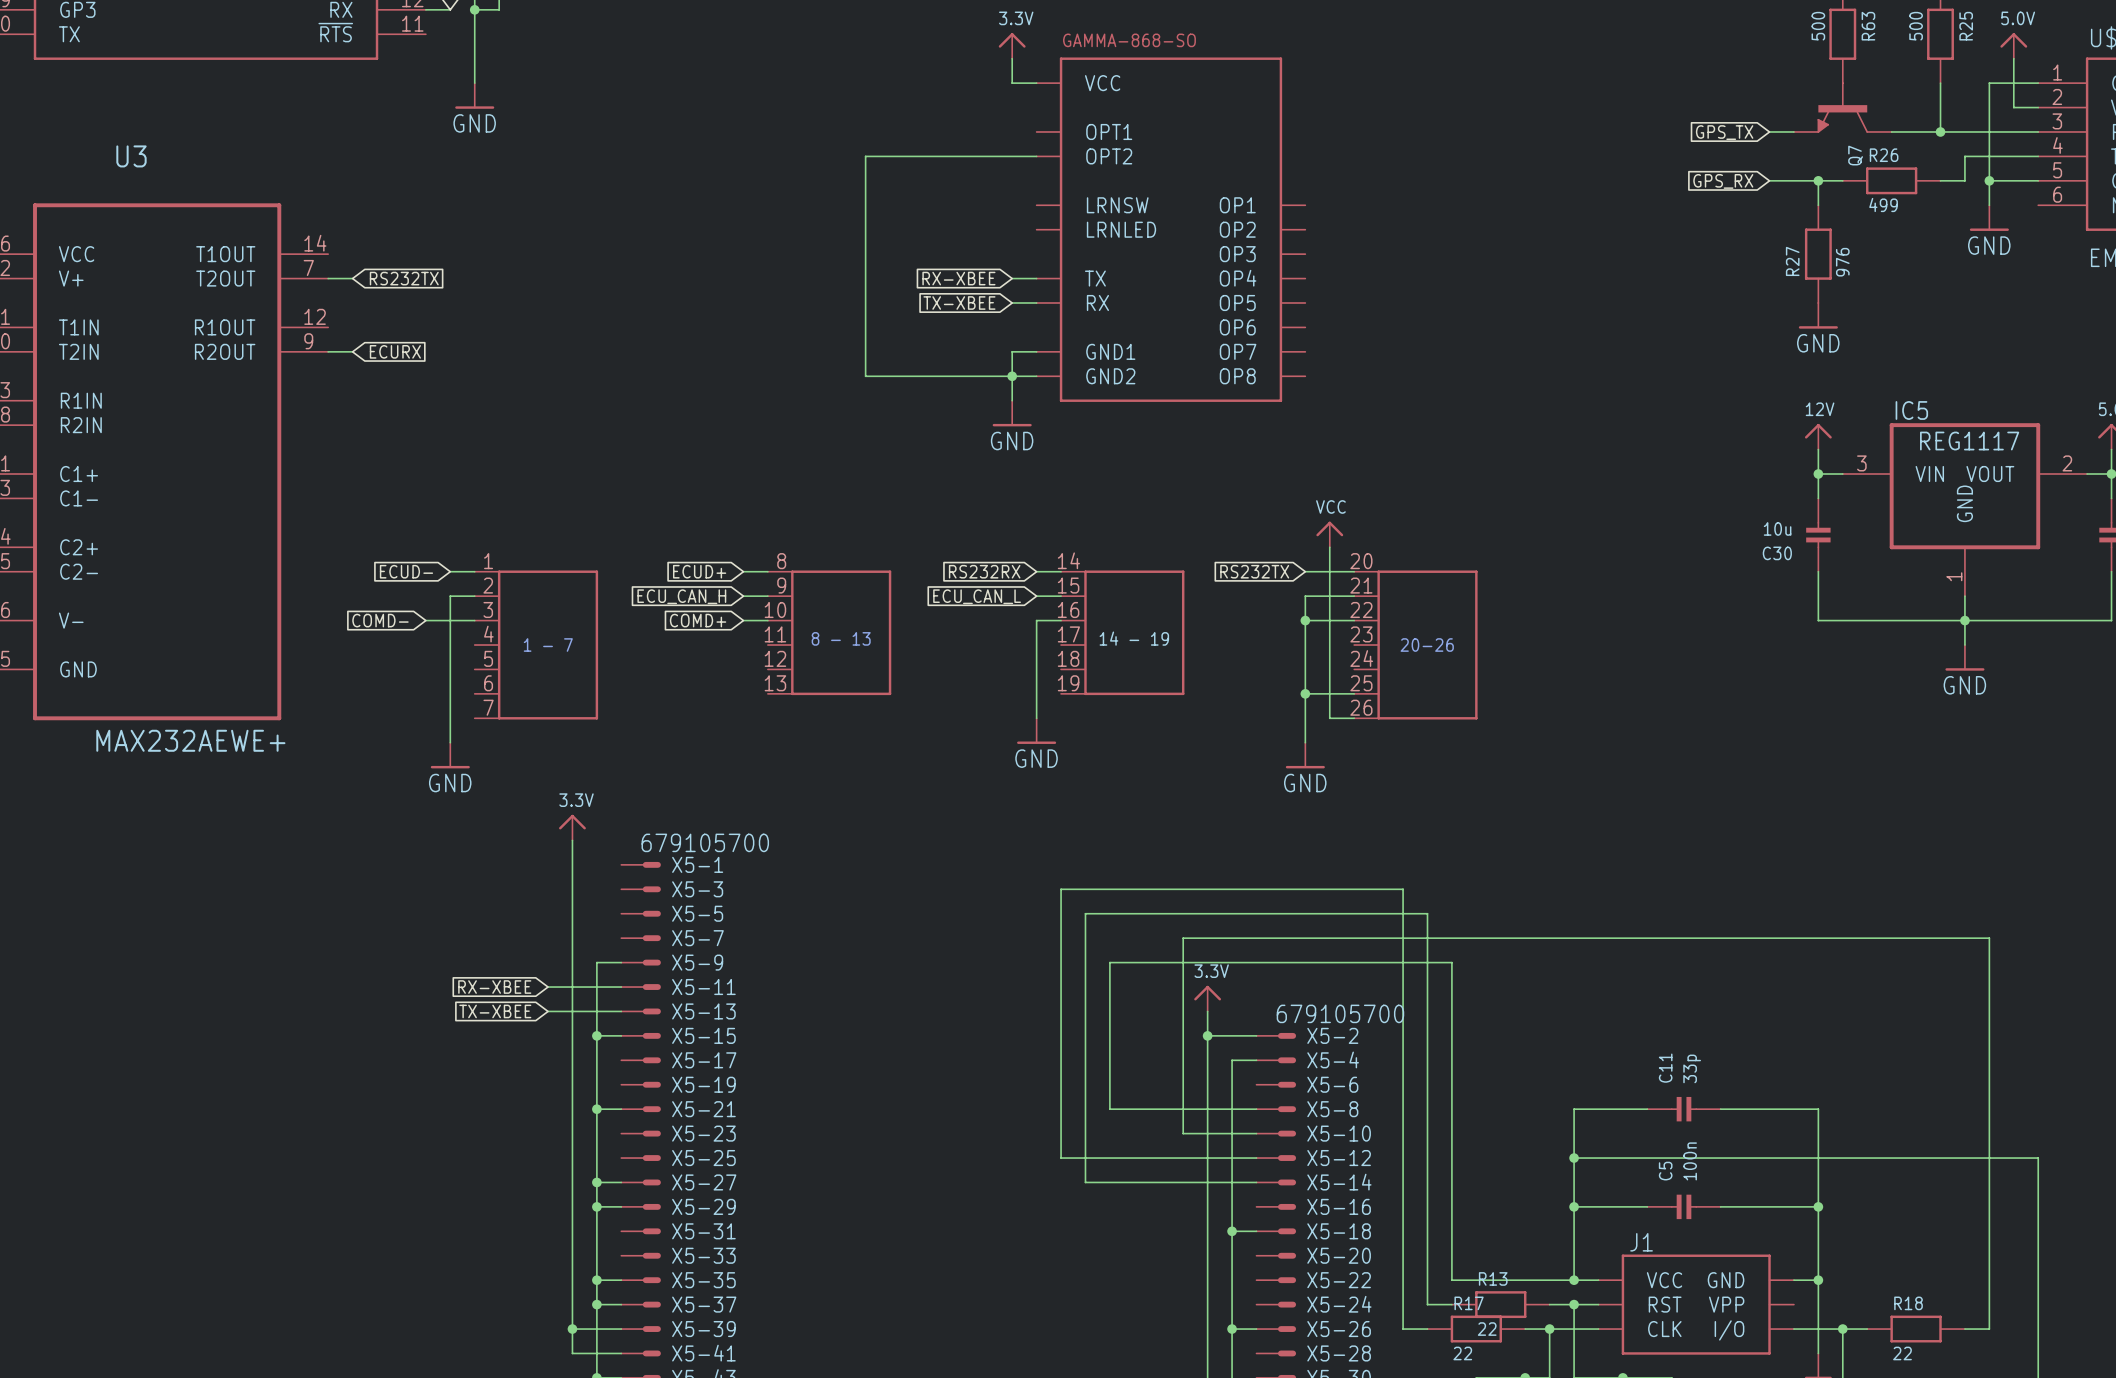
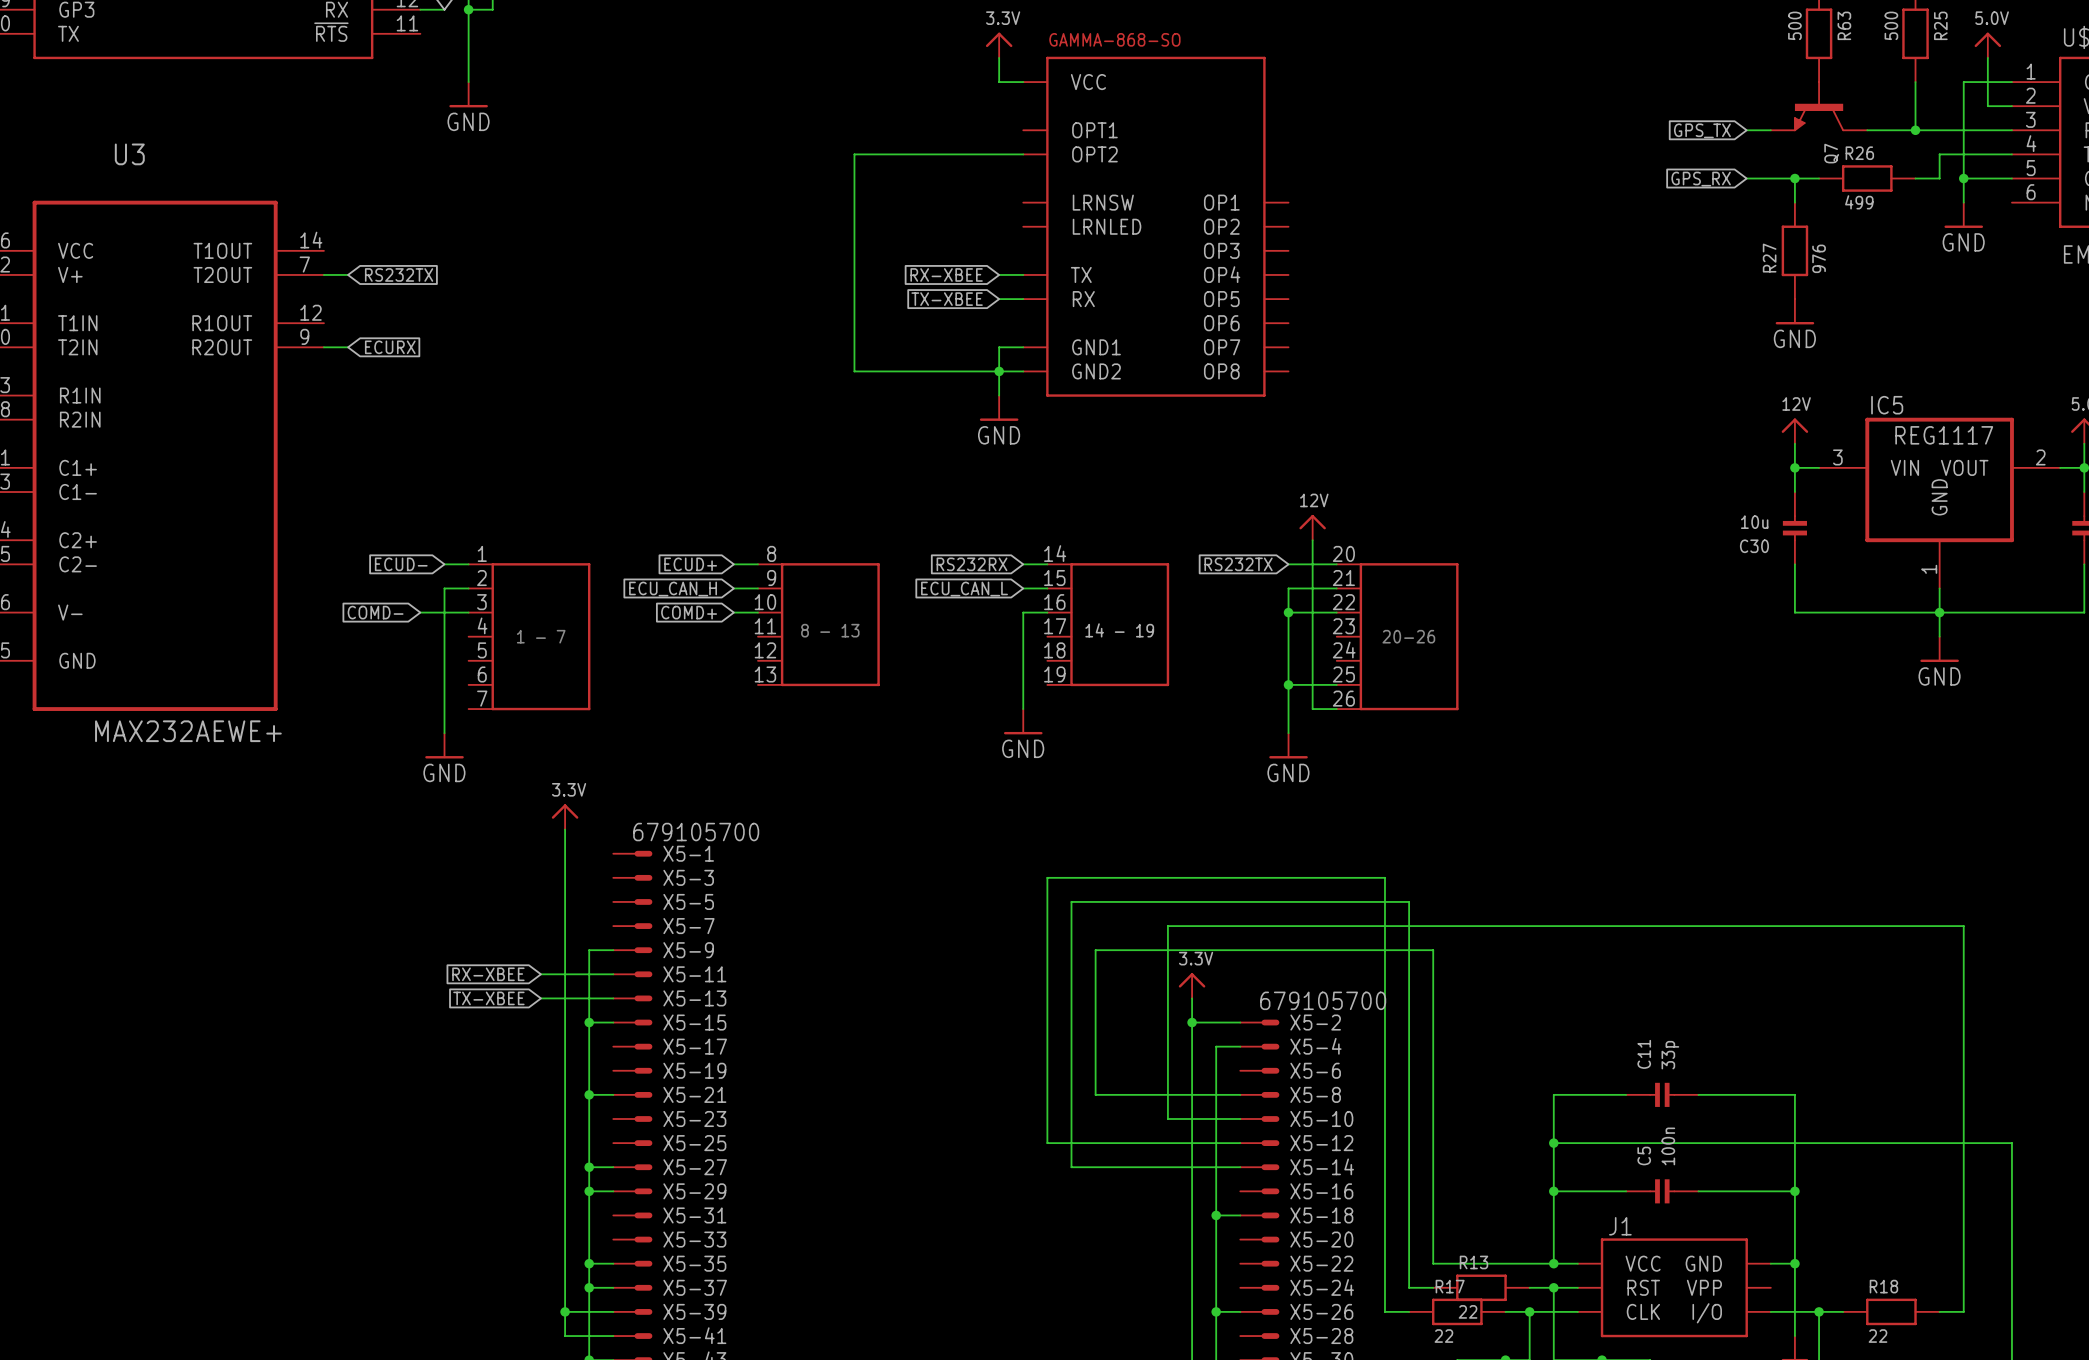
power symbol: VCC (1329, 534) -> 12V (1312, 527)

